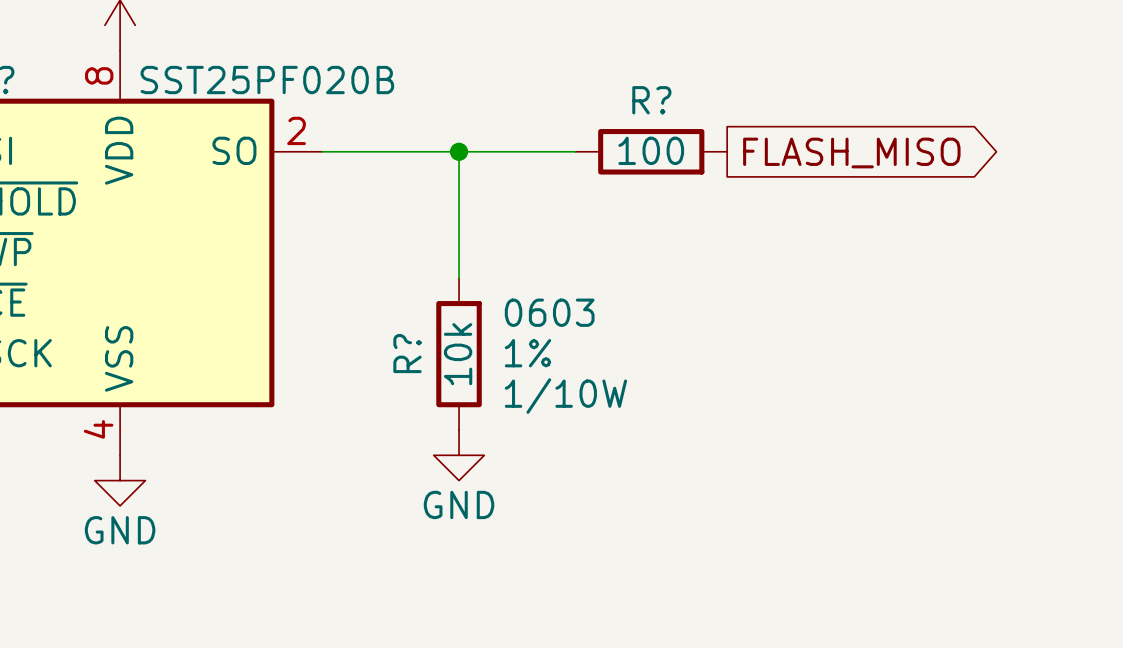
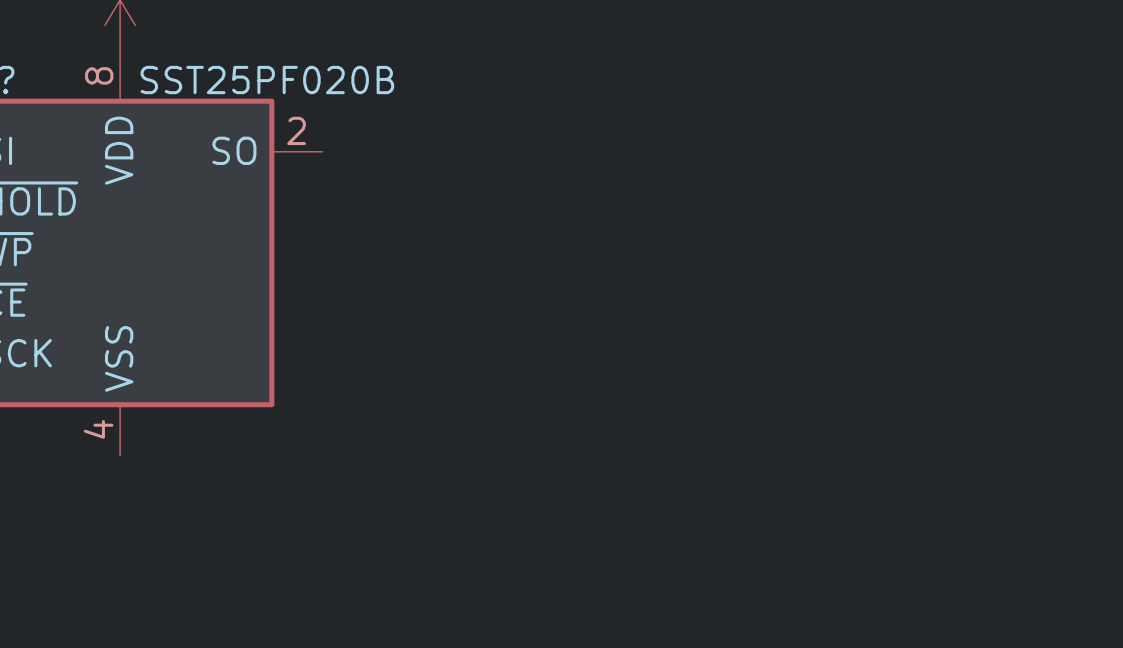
wire: (322, 151) (575, 151) -> none
wire: (459, 151) (459, 278) -> none
junction: (459, 151) -> none
R?: 100 (651, 151) -> none
global label: FLASH_MISO (851, 152) -> none
R?: 10k (459, 354) -> none
power symbol: GND (459, 455) -> none
power symbol: GND (120, 480) -> none

